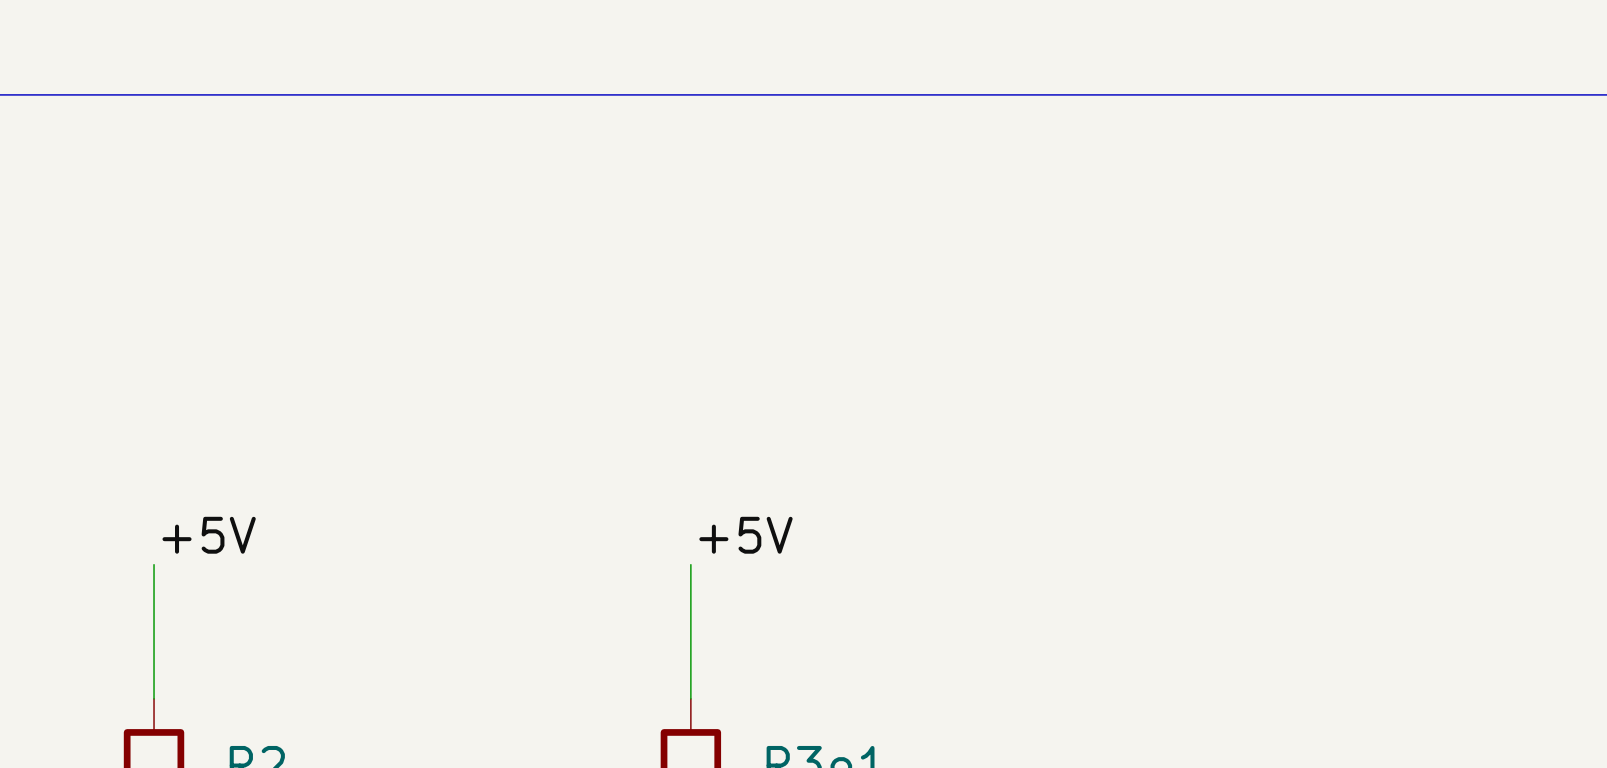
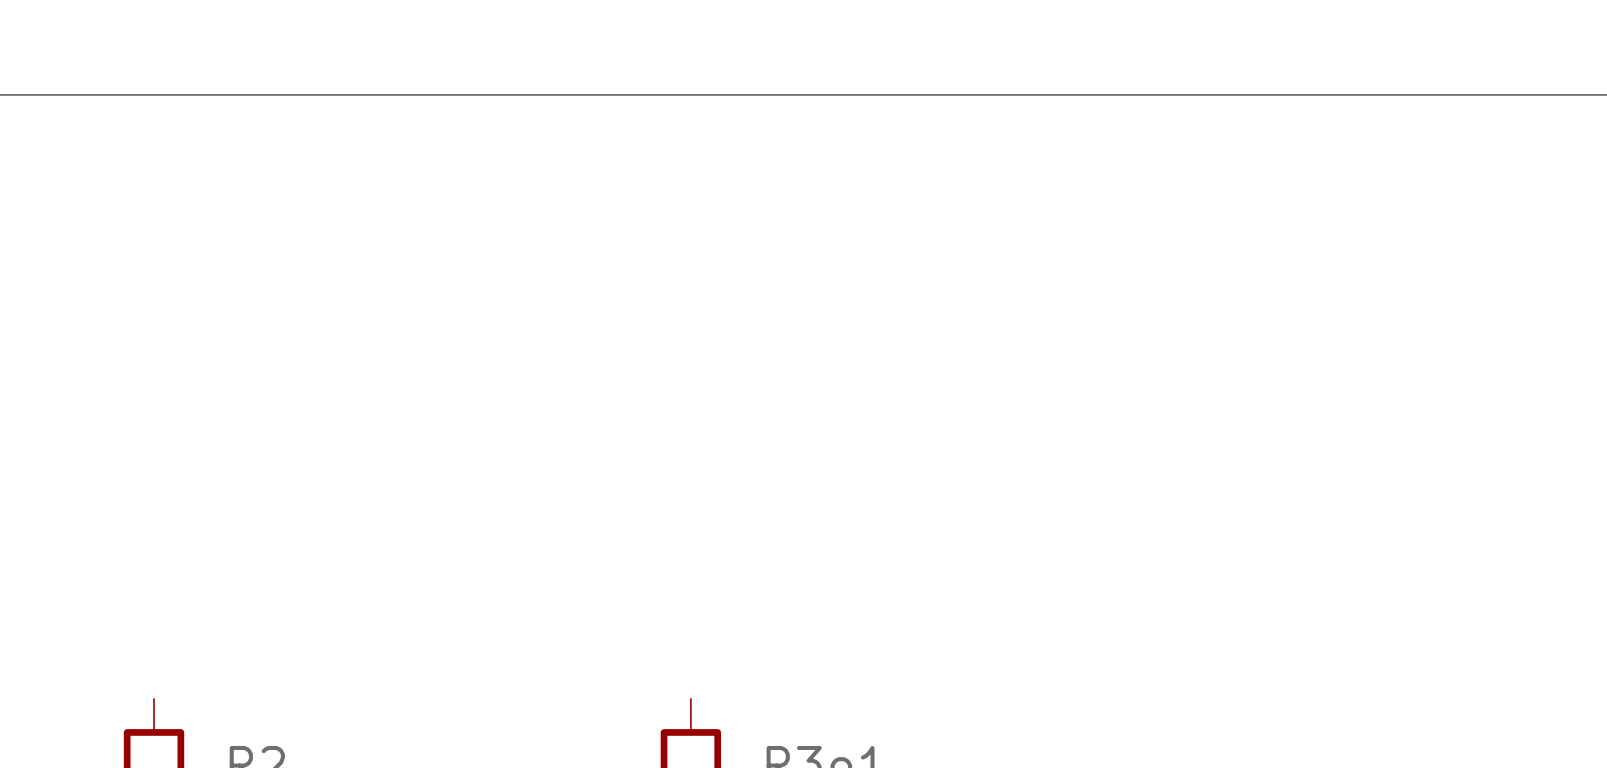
label: +5V (209, 535) -> none
label: +5V (745, 535) -> none
wire: (154, 564) (154, 698) -> none
wire: (690, 564) (690, 698) -> none

